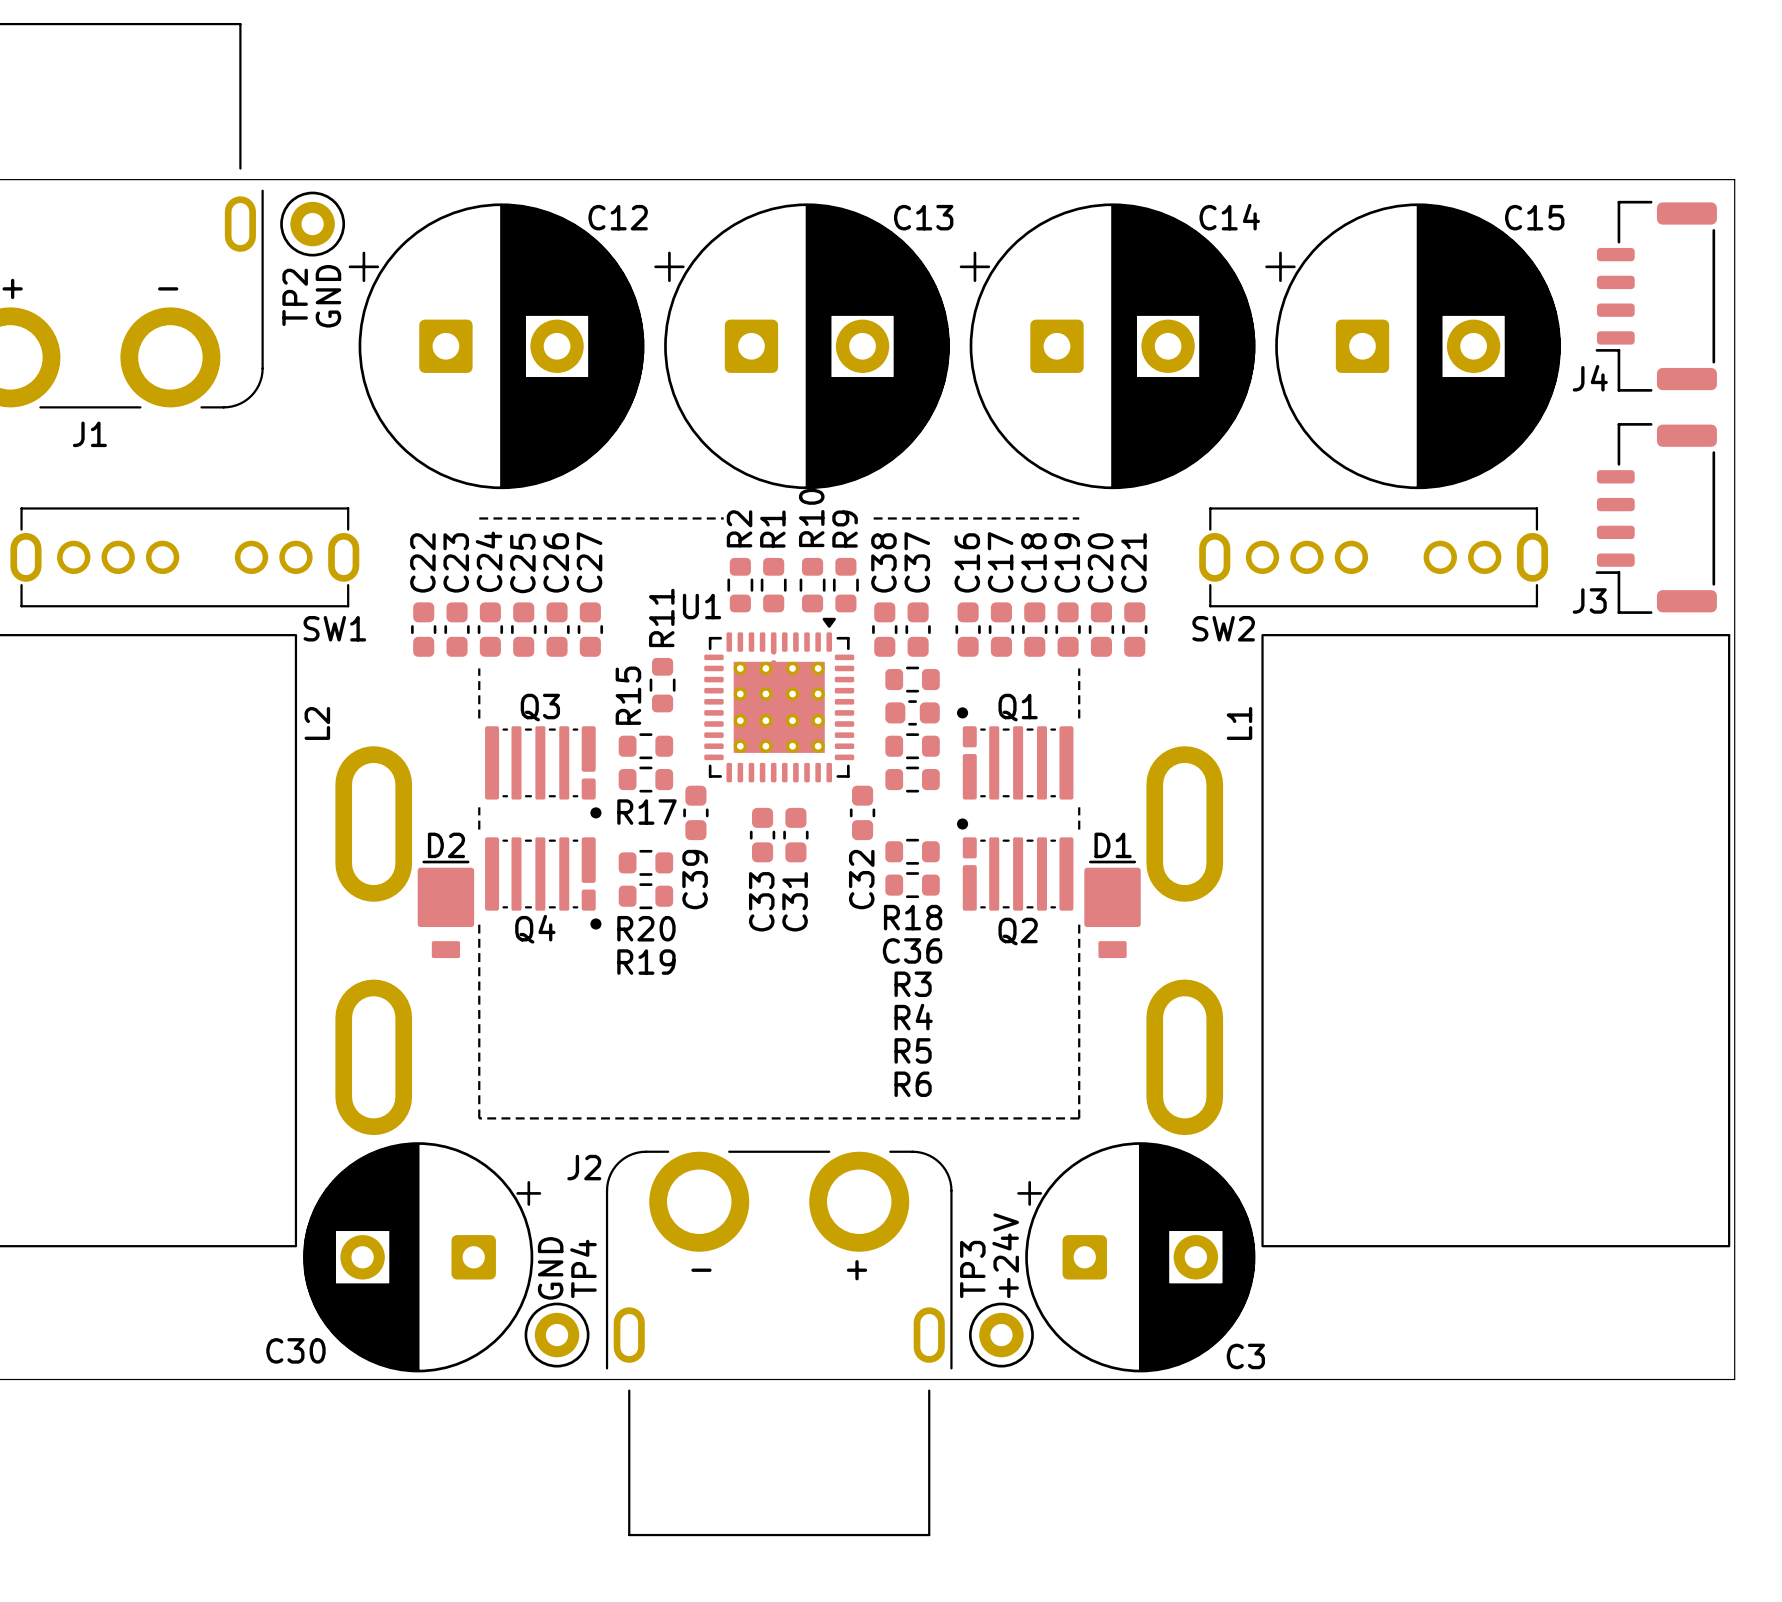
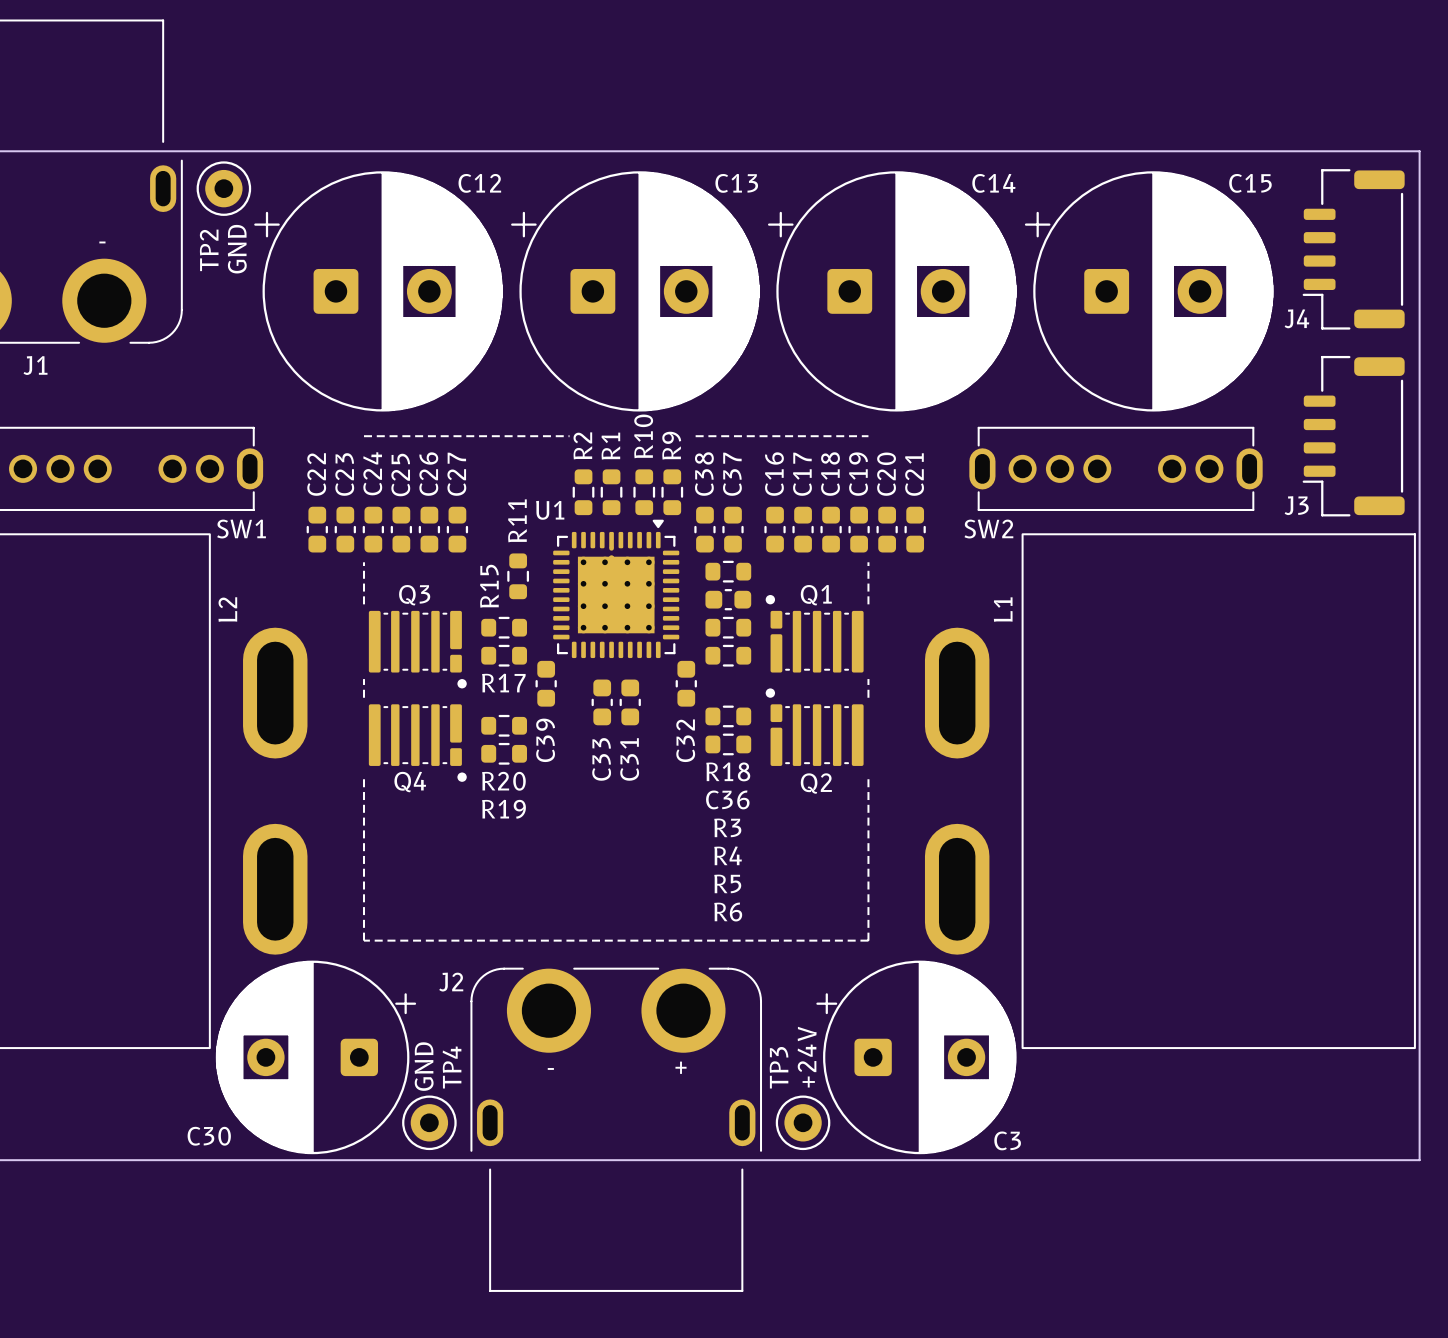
D2: (445, 909) -> none
D1: (1112, 909) -> none

